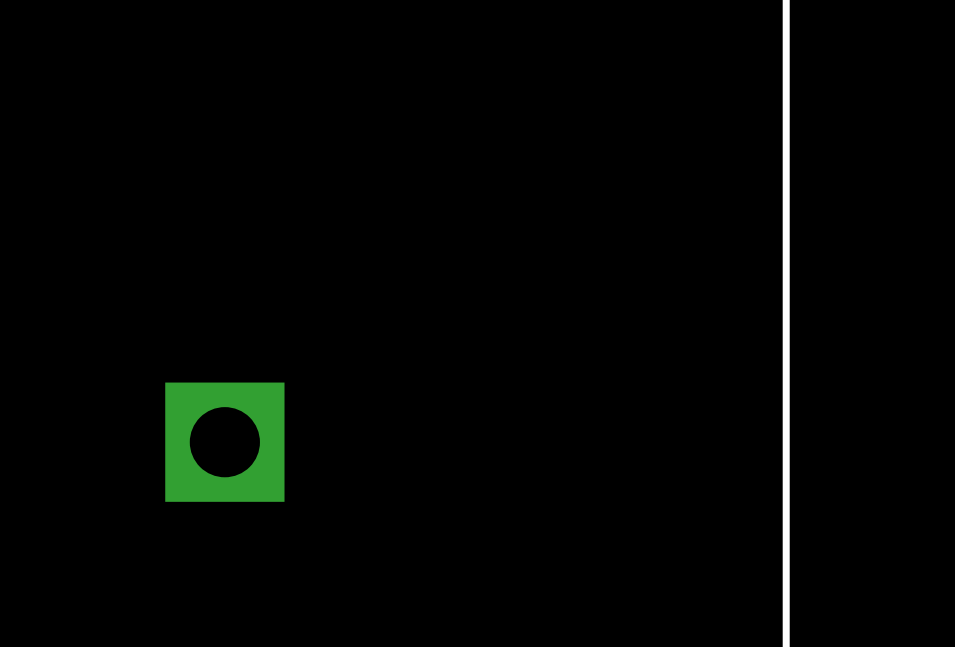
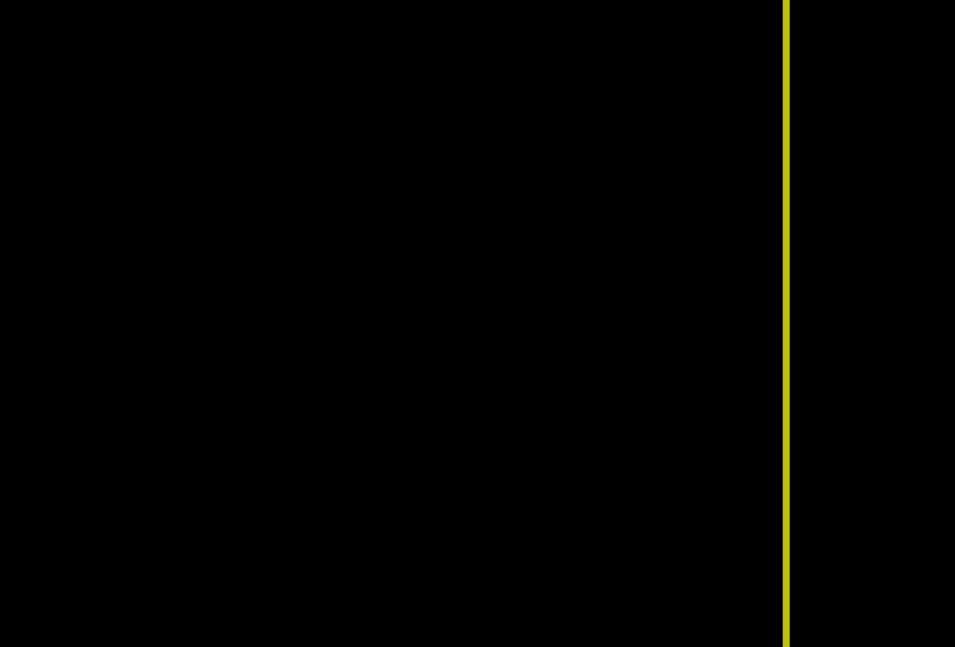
part: (224, 442) -> none

